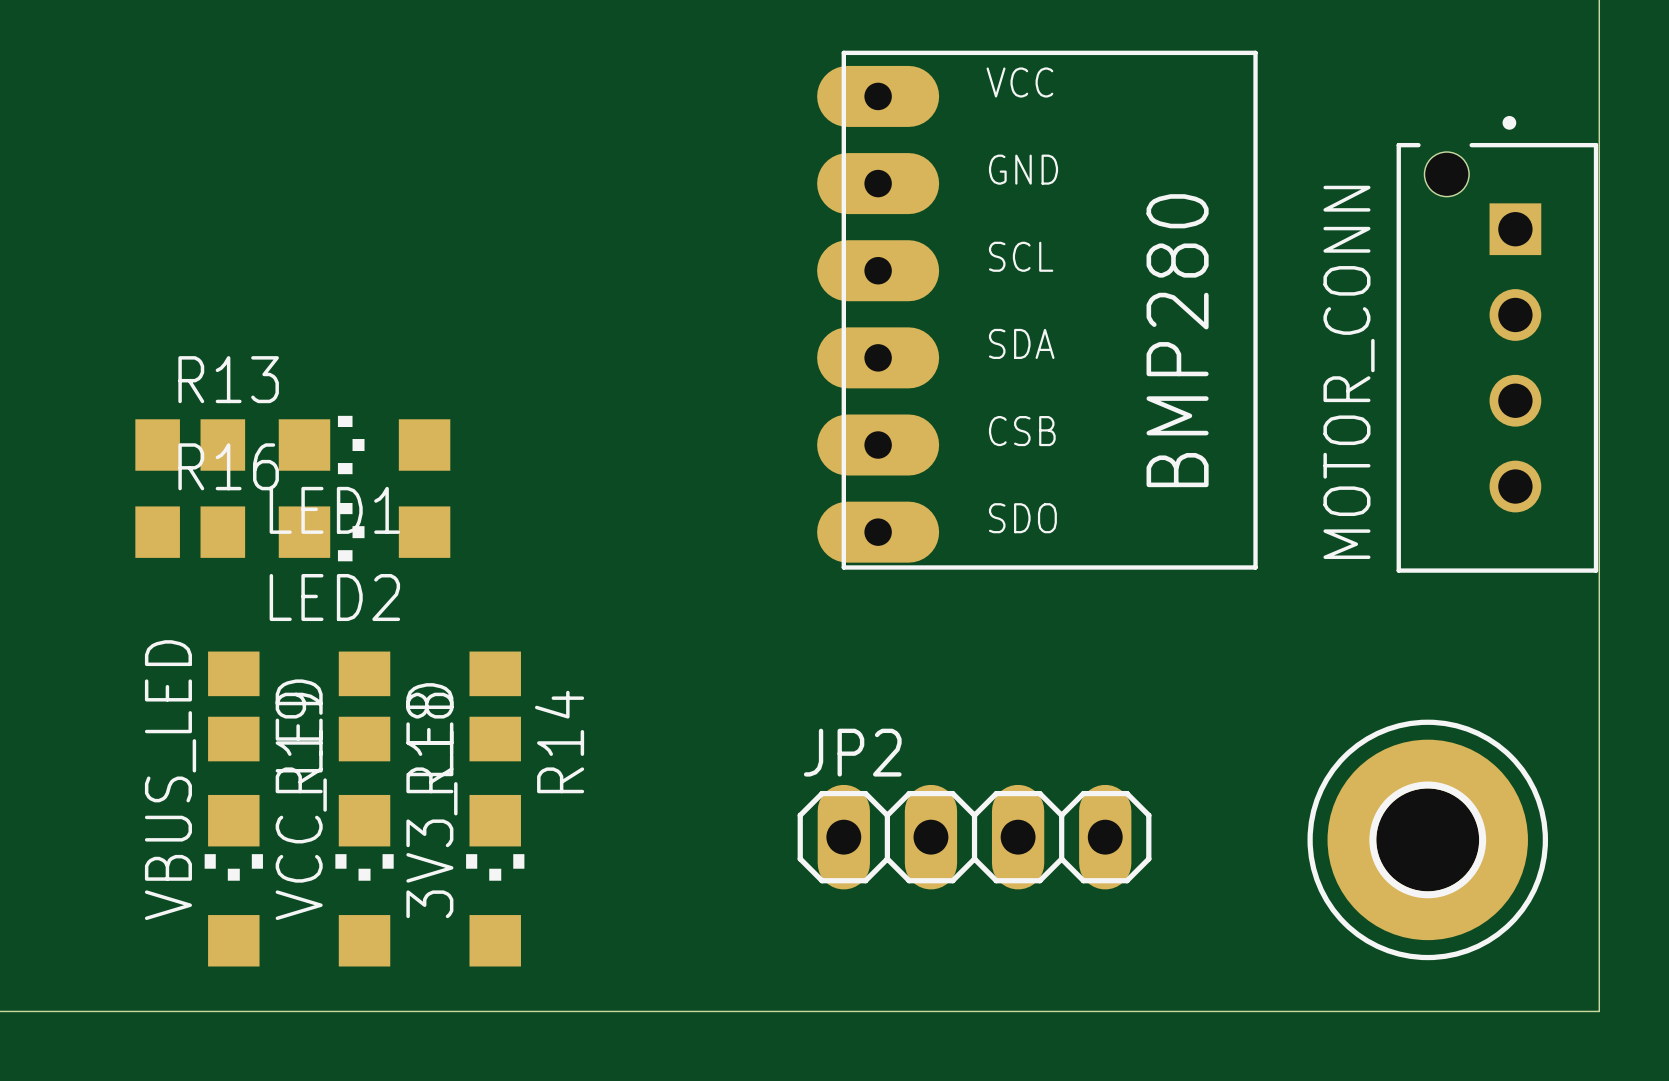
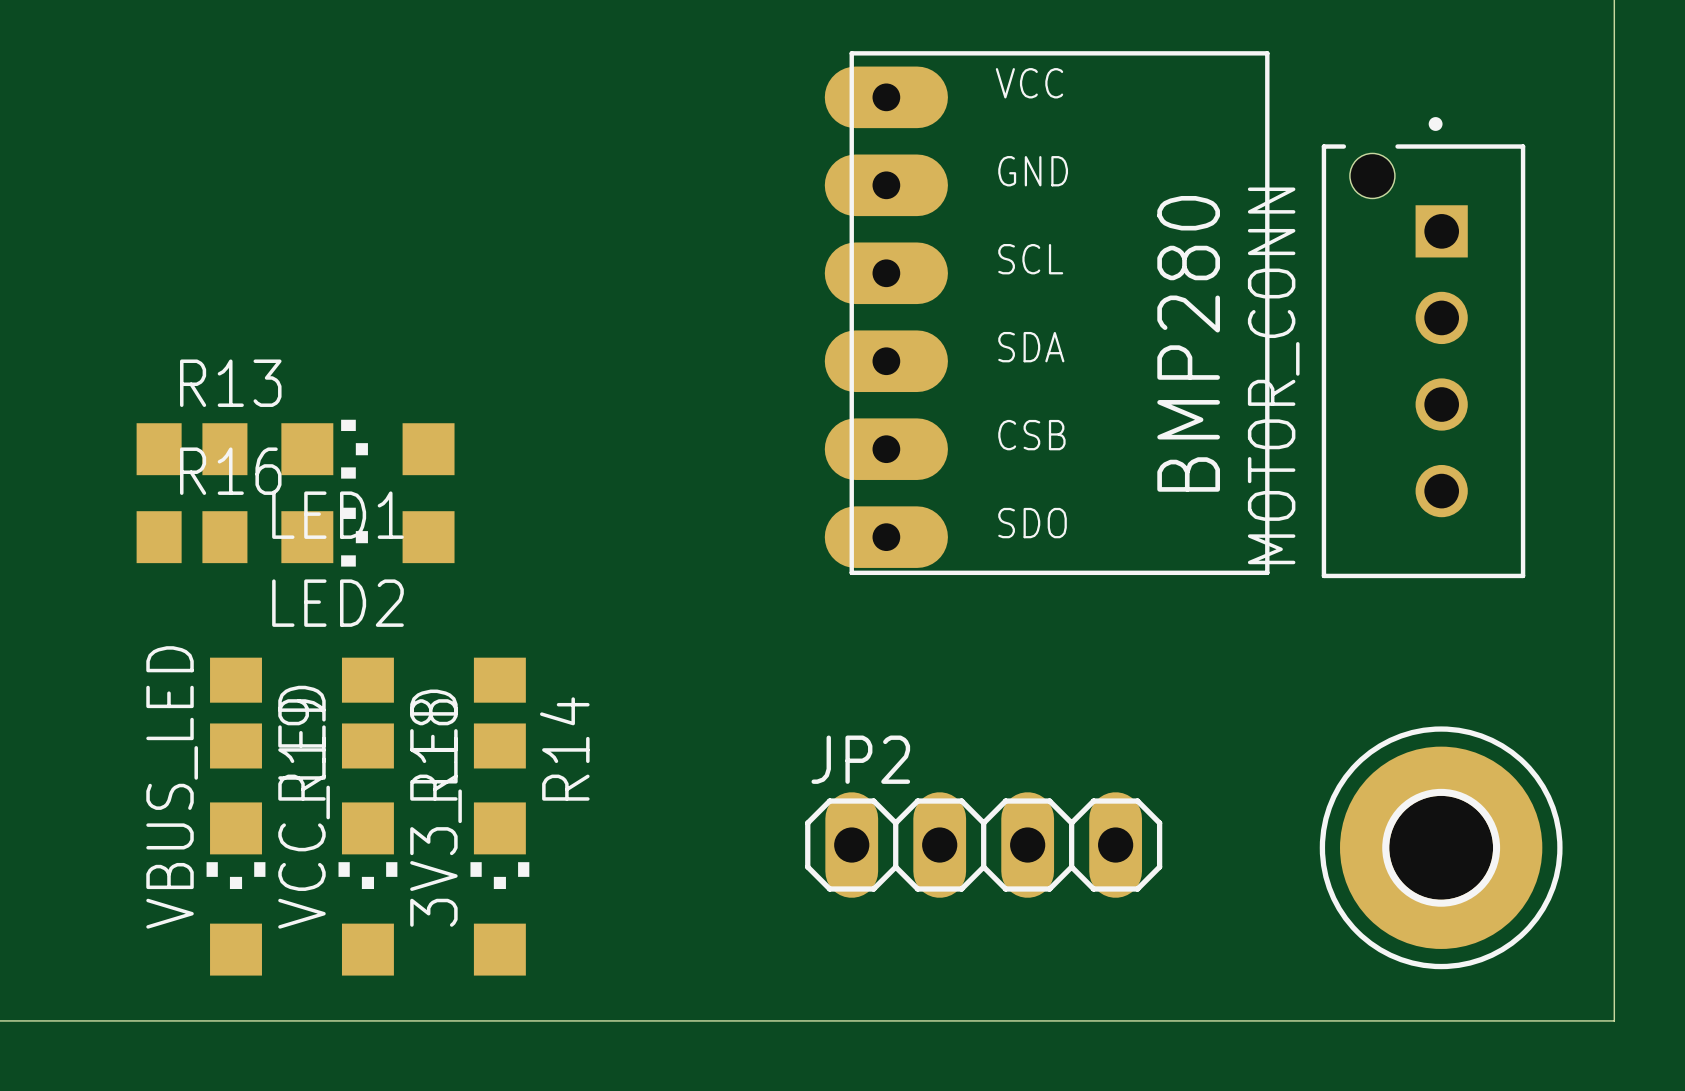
MOTOR_CONN position: (1497, 344) -> (1423, 347)

